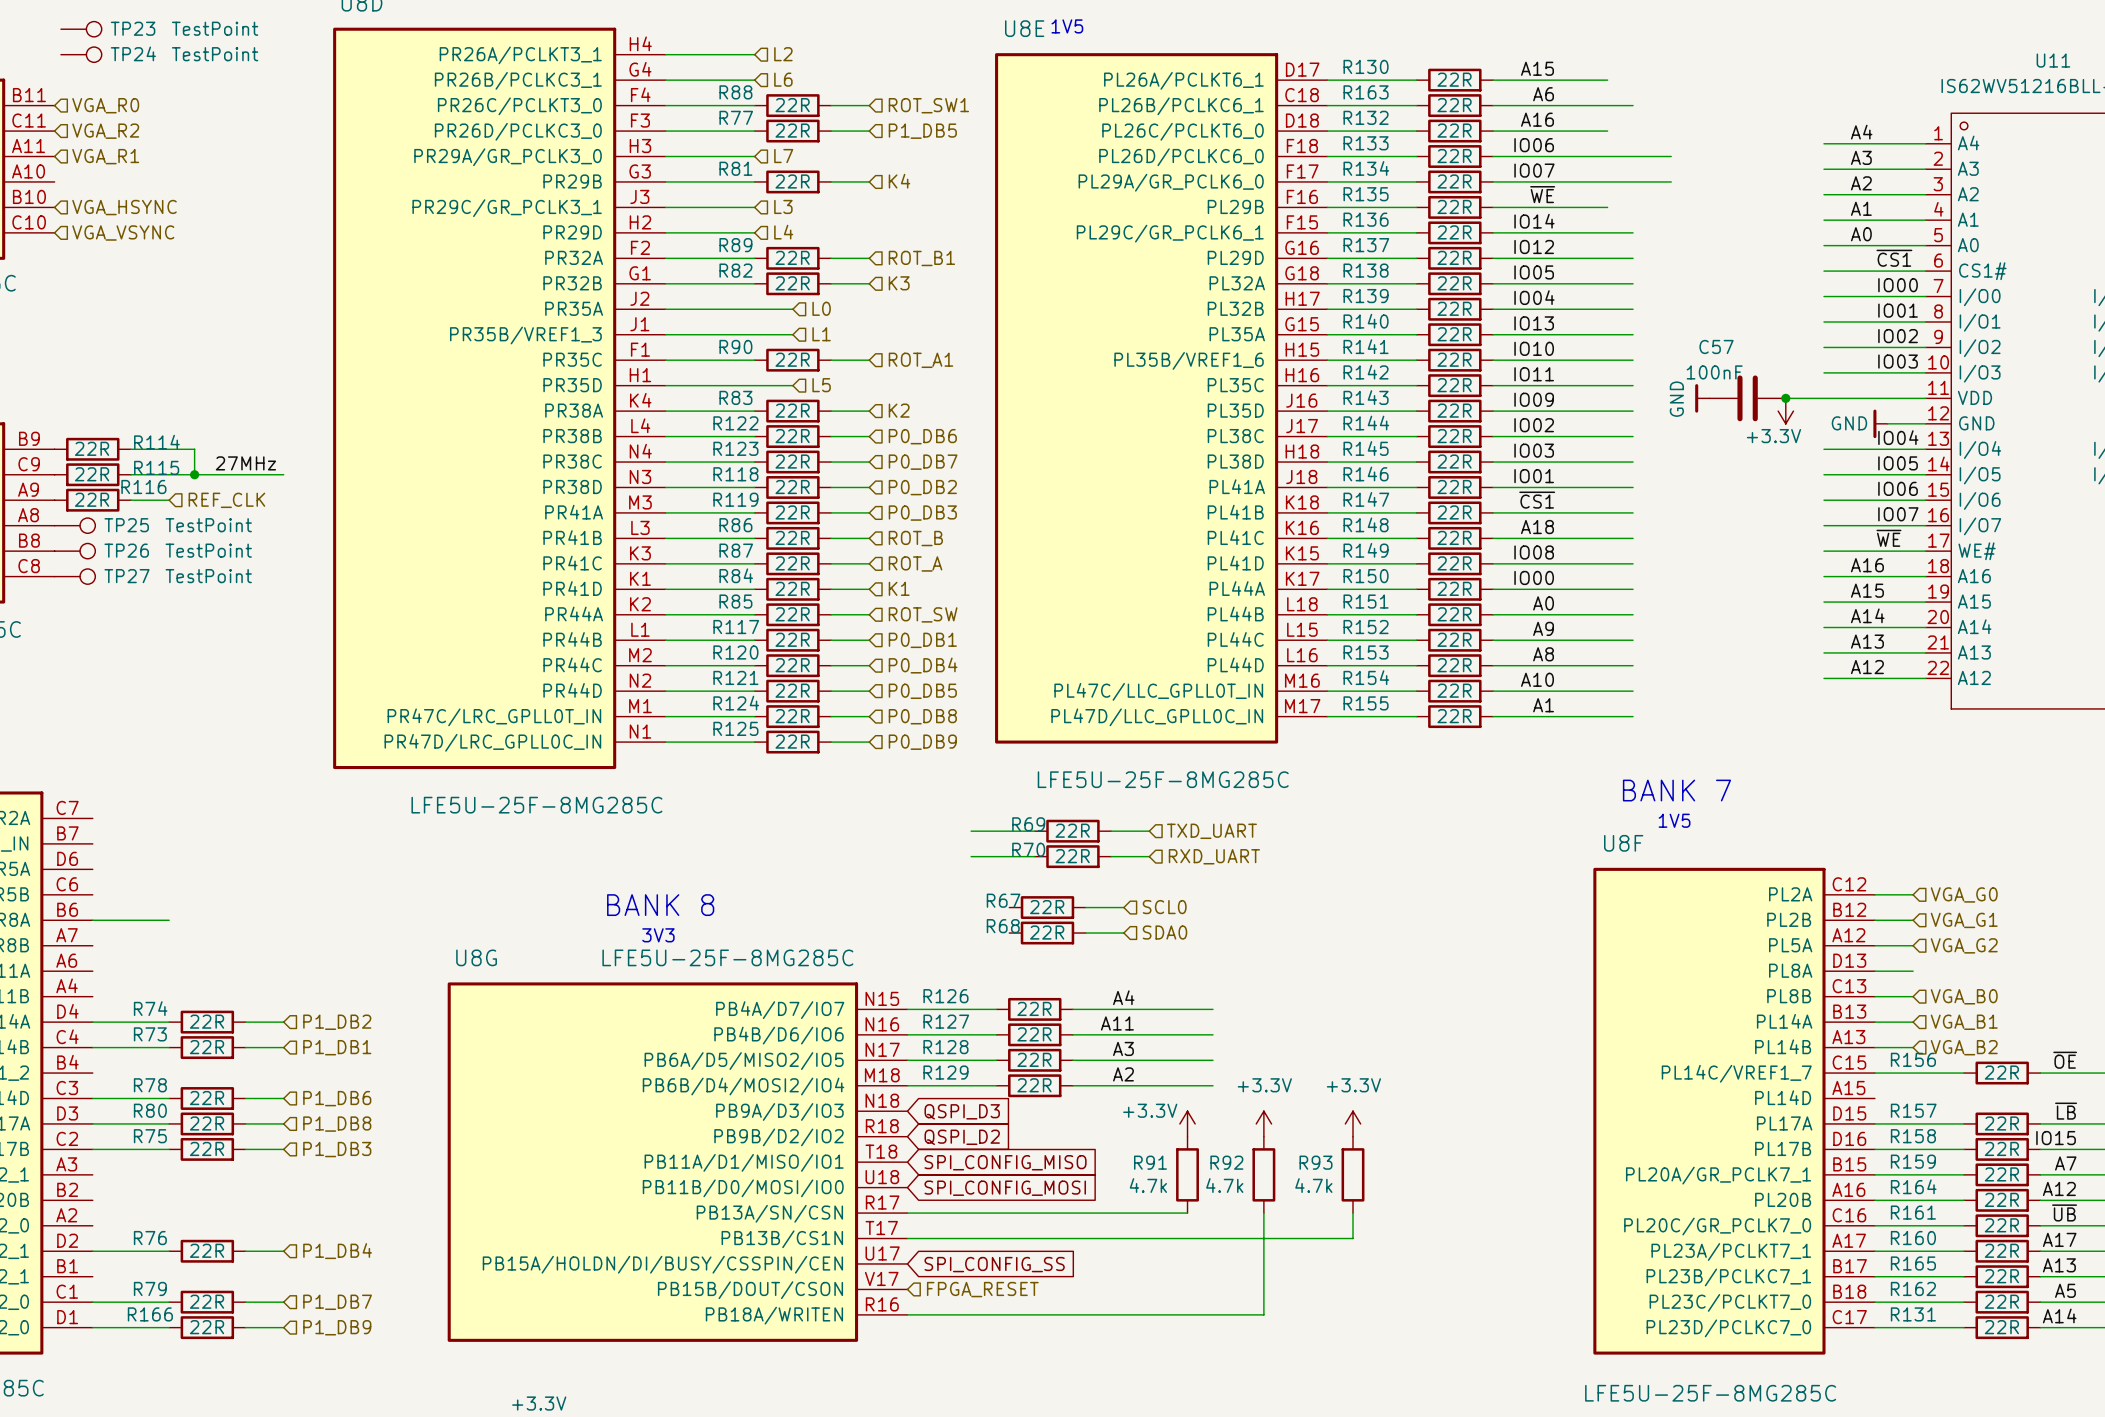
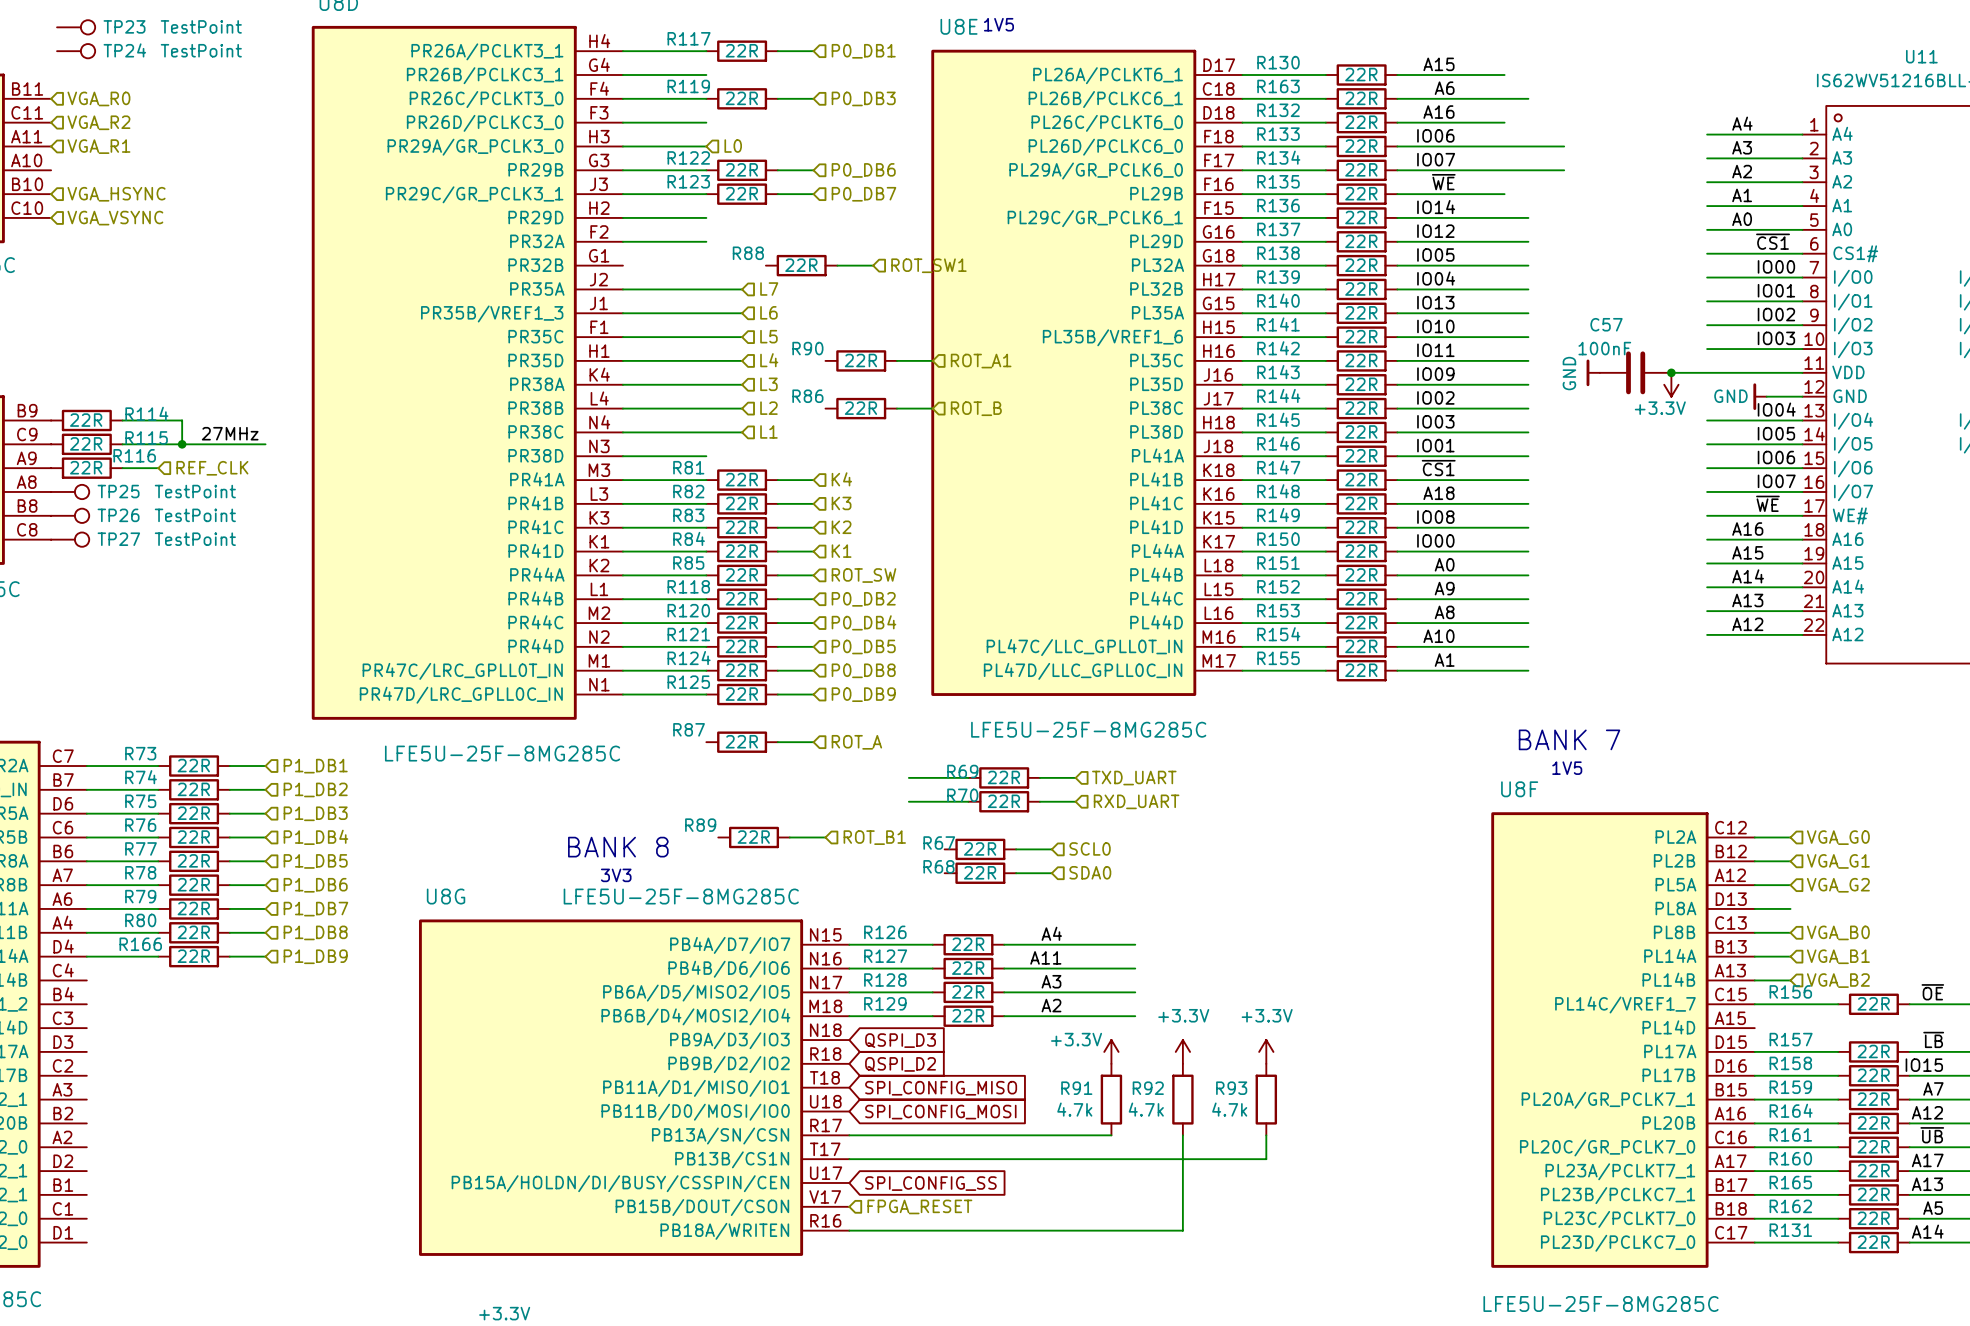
hierarchical label: L2 (783, 54) -> none
R117: none -> 22R (742, 51)
hierarchical label: none -> P0_DB1 (863, 51)
hierarchical label: L6 (783, 79) -> none
R88 name: R88 (735, 92) -> R119 (688, 86)
hierarchical label: ROT_SW1 (928, 105) -> P0_DB3 (863, 98)
R77 position: (792, 131) -> (194, 861)
wire: (831, 131) (869, 131) -> (837, 265) (873, 265)
hierarchical label: P1_DB5 (922, 131) -> none
hierarchical label: L7 (783, 156) -> L0 (733, 146)
R81 name: R81 (735, 168) -> R122 (688, 157)
hierarchical label: K4 (899, 181) -> P0_DB6 (863, 170)
hierarchical label position: L3 (783, 206) -> L3 (768, 384)
hierarchical label: none -> P0_DB7 (863, 194)
hierarchical label: L4 (783, 232) -> none
R89 position: (792, 258) -> (754, 837)
wire: (831, 258) (869, 258) -> (777, 51) (813, 51)
hierarchical label: ROT_B1 (921, 258) -> ROT_SW1 (928, 265)
wire: (665, 283) (754, 283) -> none
R82: 22R (792, 283) -> none
wire: (831, 283) (869, 283) -> (706, 337) (742, 337)
R88: none -> 22R (801, 265)
hierarchical label: K3 (899, 283) -> none
hierarchical label: L0 (821, 308) -> L7 (769, 289)
hierarchical label: L1 (821, 334) -> L6 (768, 312)
hierarchical label: none -> L5 (768, 336)
R90 position: (792, 360) -> (861, 360)
wire: (831, 360) (869, 360) -> (777, 194) (813, 194)
hierarchical label position: ROT_A1 (921, 360) -> ROT_A1 (981, 361)
hierarchical label: L5 (821, 385) -> L4 (769, 360)
wire: none -> (896, 360) (932, 360)
hierarchical label: K2 (899, 410) -> none
R83: 22R (792, 411) -> none
wire: (831, 411) (869, 411) -> (706, 384) (742, 384)
R122: 22R (792, 436) -> none
hierarchical label: none -> L2 (768, 408)
wire: (831, 436) (869, 436) -> (706, 408) (742, 408)
R86: none -> 22R (861, 408)
hierarchical label: P0_DB6 (922, 436) -> none
hierarchical label: none -> ROT_B (976, 408)
hierarchical label: none -> L1 (768, 431)
R123 position: (792, 462) -> (742, 194)
wire: (831, 462) (869, 462) -> (706, 432) (742, 432)
hierarchical label: P0_DB7 (923, 462) -> none
R118: 22R (792, 487) -> none
wire: (831, 487) (869, 487) -> (896, 408) (932, 408)
hierarchical label: P0_DB2 (922, 487) -> none
R119 name: R119 (735, 499) -> R81 (688, 467)
hierarchical label: P0_DB3 (922, 513) -> K4 (841, 479)
R86 name: R86 (735, 525) -> R82 (688, 491)
hierarchical label: ROT_B (915, 538) -> K3 (841, 503)
R87 name: R87 (736, 550) -> R83 (688, 515)
hierarchical label: ROT_A (915, 563) -> K2 (841, 527)
R117 name: R117 (736, 627) -> R118 (688, 586)
hierarchical label: P0_DB1 (922, 640) -> P0_DB2 (863, 599)
R87: none -> 22R (742, 742)
wire: none -> (777, 742) (813, 742)
hierarchical label: none -> ROT_A (856, 742)
wire: none -> (86, 766) (158, 766)
wire: none -> (229, 766) (265, 766)
wire: none -> (86, 789) (158, 789)
R74: none -> 22R (194, 789)
wire: none -> (229, 789) (265, 789)
hierarchical label: none -> P1_DB2 (315, 789)
wire: none -> (86, 813) (158, 813)
wire: none -> (229, 813) (265, 813)
hierarchical label: none -> P1_DB3 (315, 813)
hierarchical label: none -> P1_DB4 (315, 837)
wire: none -> (789, 837) (825, 837)
hierarchical label: none -> ROT_B1 (874, 837)
wire: none -> (229, 861) (265, 861)
hierarchical label: none -> P1_DB5 (315, 861)
hierarchical label: none -> P1_DB7 (315, 909)
R74 name: R74 (150, 1008) -> R166 (140, 944)
hierarchical label: P1_DB2 (337, 1022) -> P1_DB9 (315, 956)
wire: (92, 1047) (169, 1047) -> (86, 837) (158, 837)
R73 position: (207, 1047) -> (194, 766)
wire: (245, 1047) (283, 1047) -> (229, 837) (265, 837)
hierarchical label position: P1_DB1 (337, 1047) -> P1_DB1 (315, 766)
wire: (92, 1098) (169, 1098) -> (86, 885) (158, 885)
R78 position: (207, 1098) -> (194, 885)
wire: (245, 1098) (283, 1098) -> (229, 885) (265, 885)
hierarchical label position: P1_DB6 (337, 1098) -> P1_DB6 (315, 885)
wire: (92, 1123) (169, 1123) -> (86, 908) (158, 908)
R80 position: (207, 1123) -> (194, 932)
wire: (245, 1123) (283, 1123) -> (229, 908) (265, 908)
hierarchical label position: P1_DB8 (337, 1124) -> P1_DB8 (315, 932)
wire: (92, 1149) (169, 1149) -> (86, 932) (158, 932)
R75 position: (207, 1149) -> (194, 813)
wire: (245, 1149) (283, 1149) -> (229, 932) (265, 932)
hierarchical label: P1_DB3 (337, 1149) -> none
wire: (92, 1251) (169, 1251) -> none
R76 position: (207, 1251) -> (194, 837)
wire: (245, 1251) (283, 1251) -> none
hierarchical label: P1_DB4 (337, 1251) -> none
wire: (92, 1302) (169, 1302) -> none
R79 position: (207, 1302) -> (194, 908)
wire: (245, 1302) (283, 1302) -> none
hierarchical label: P1_DB7 (337, 1302) -> none
wire: (92, 1327) (169, 1327) -> none
R166: 22R (207, 1327) -> none
wire: (245, 1327) (283, 1327) -> none
hierarchical label: P1_DB9 (337, 1327) -> none

